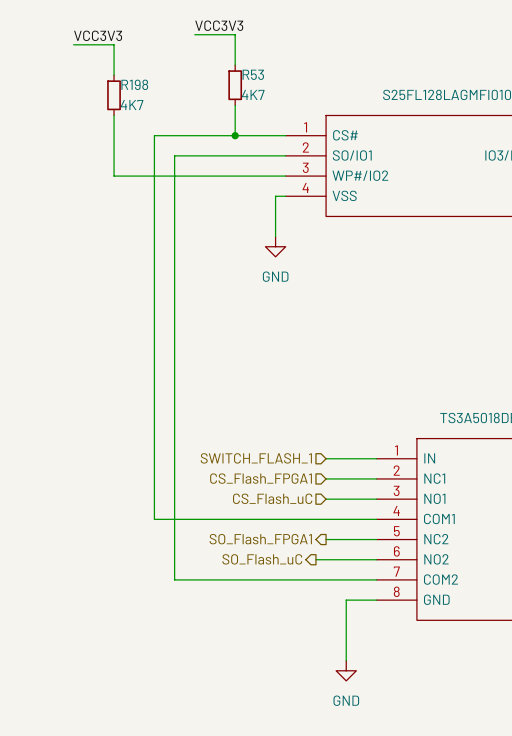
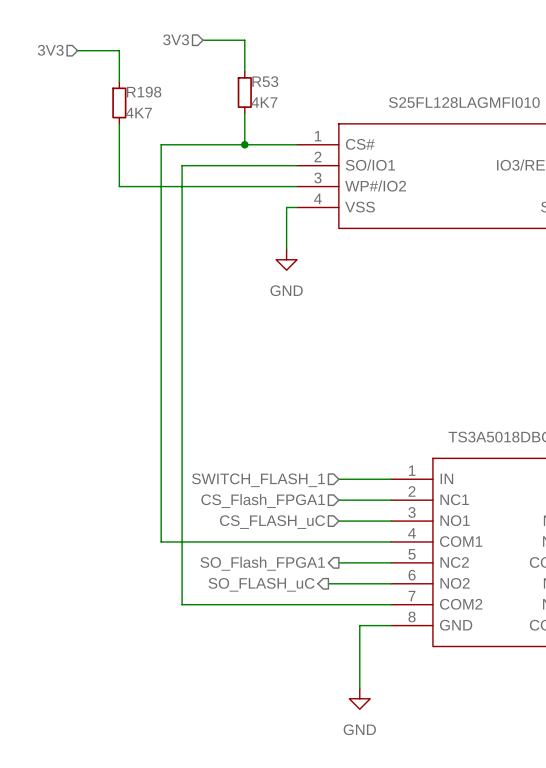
label: VCC3V3 (219, 25) -> none
hierarchical label: none -> 3V3 (176, 39)
label: VCC3V3 (98, 35) -> none
hierarchical label: none -> 3V3 (50, 50)
hierarchical label: CS_Flash_uC (272, 498) -> CS_FLASH_uC (272, 522)
hierarchical label: SO_Flash_uC (262, 559) -> SO_FLASH_uC (261, 584)

